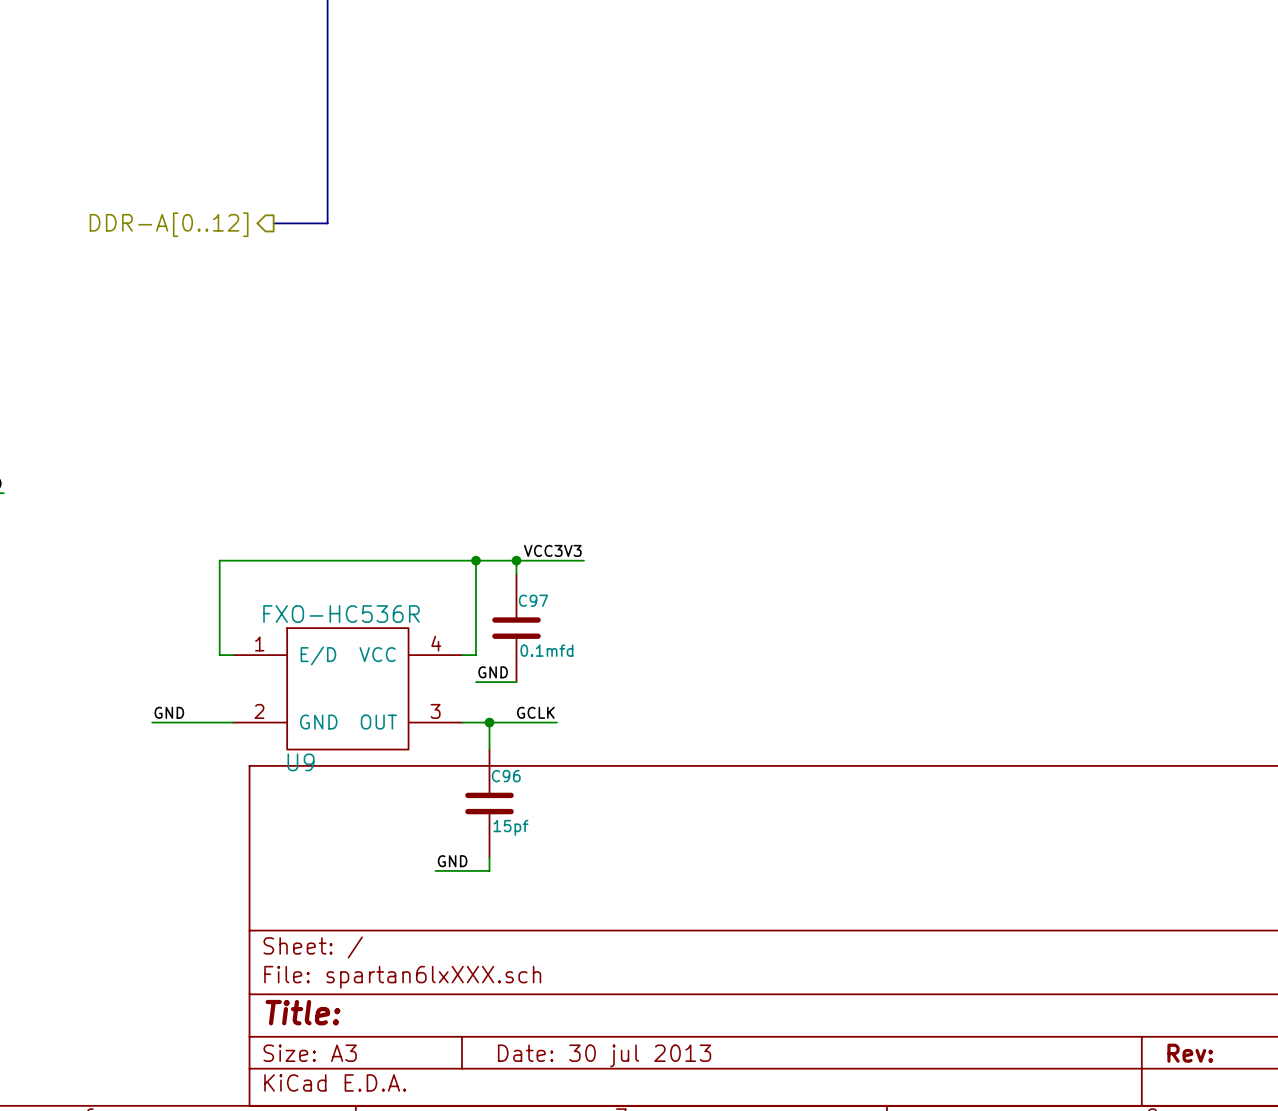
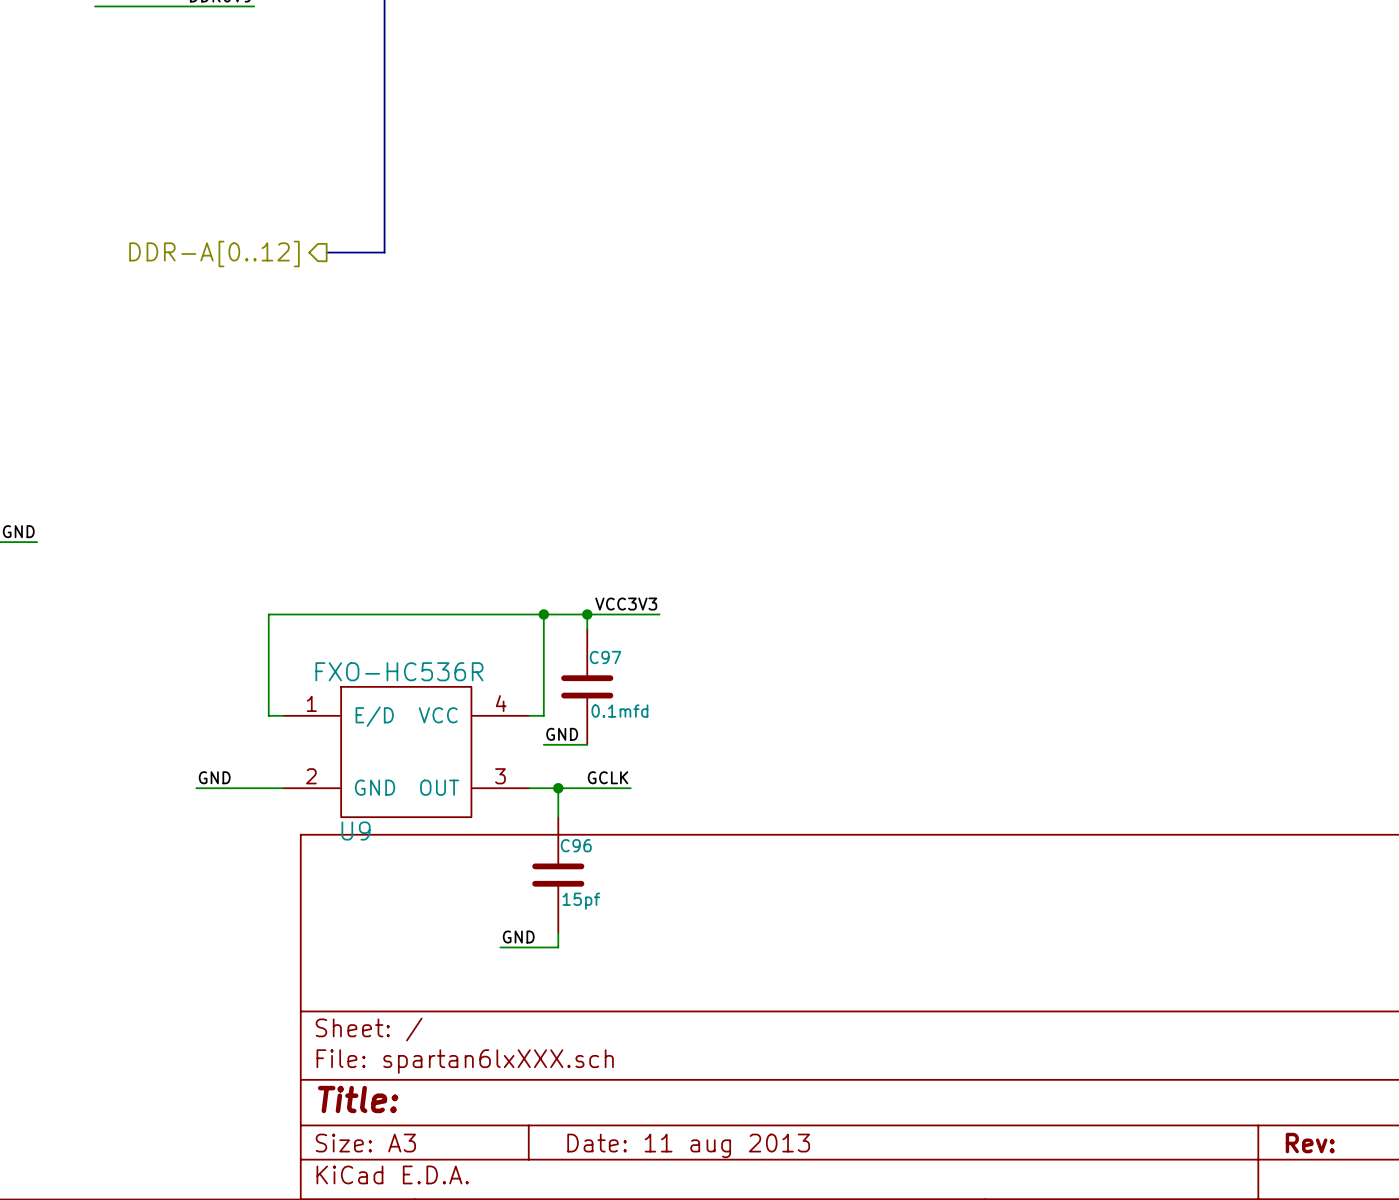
title block: Date: 30 jul 2013 (604, 1055) -> Date: 11 aug 2013 (688, 1145)

